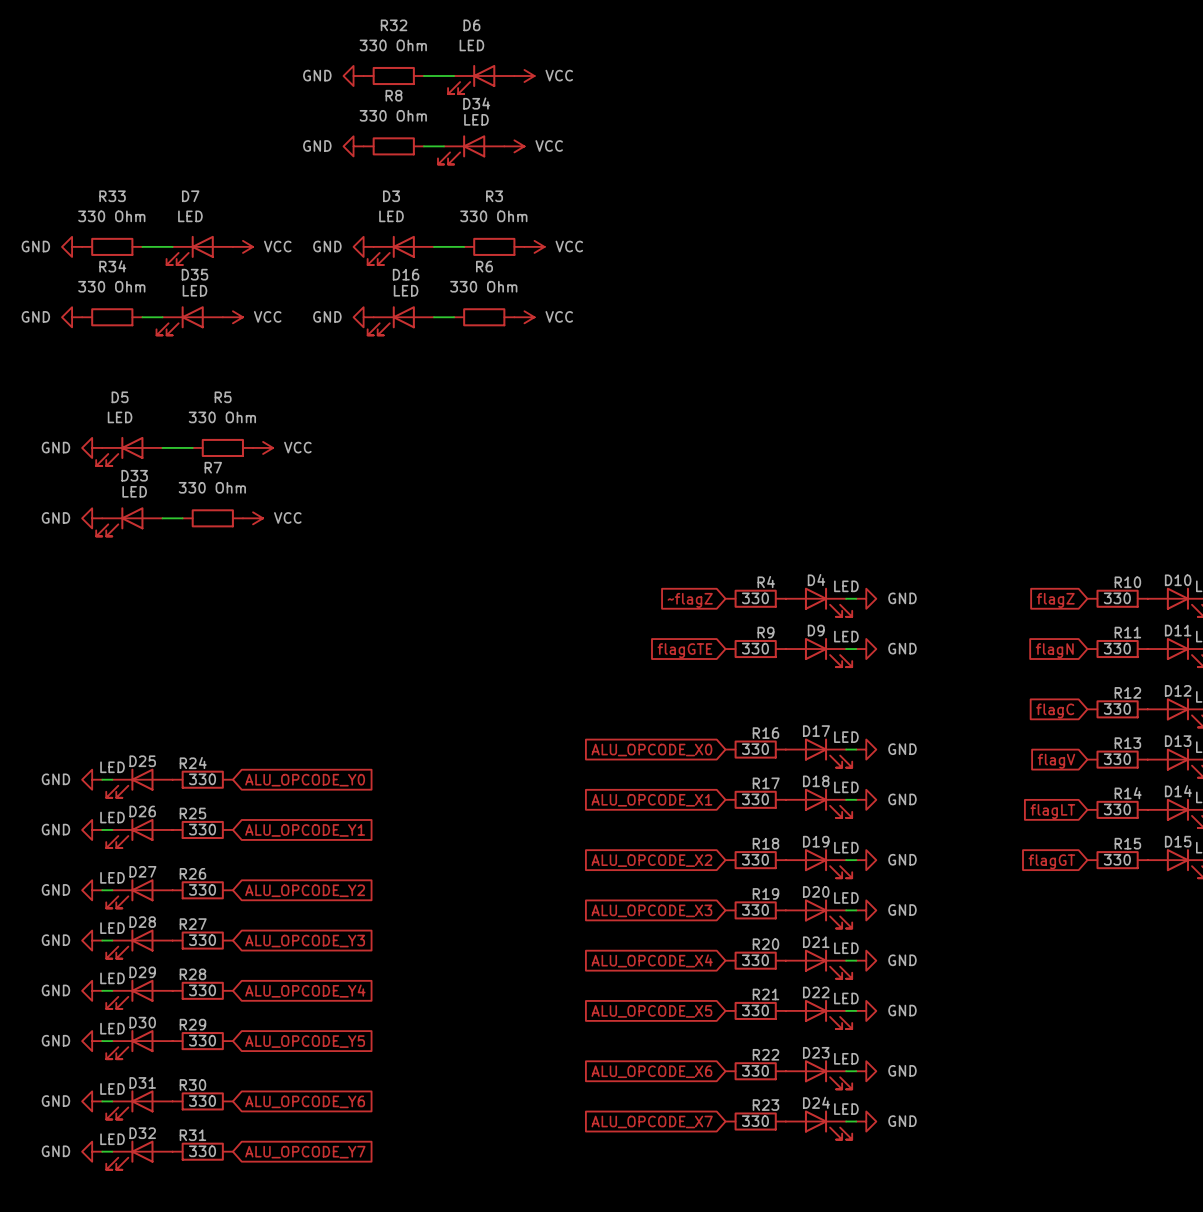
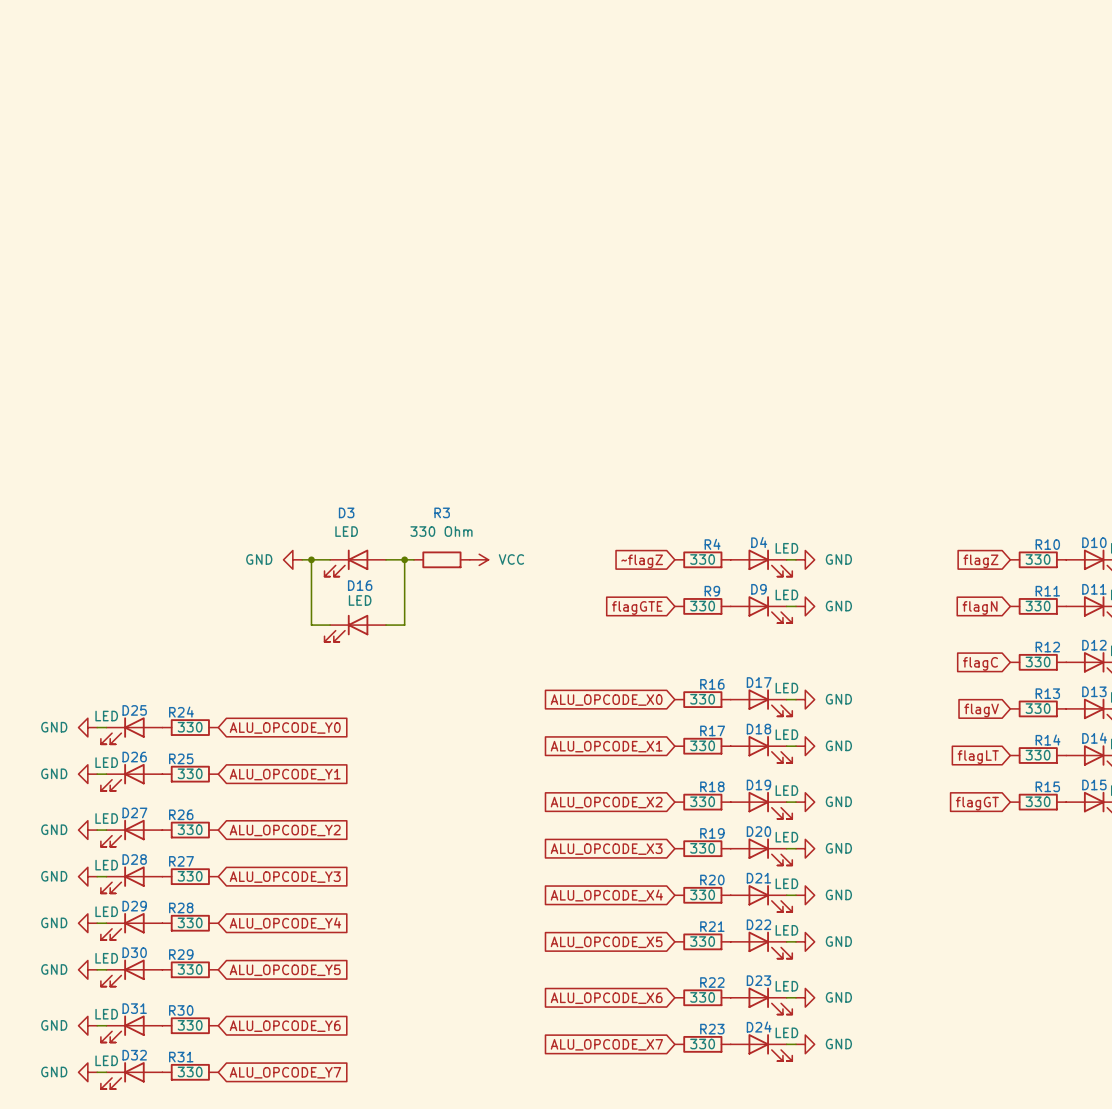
power symbol: GND (353, 76) -> none
R32: 330 Ohm (393, 76) -> none
wire: (423, 76) (454, 76) -> none
power symbol: VCC (524, 76) -> none
D6: LED (481, 79) -> none
power symbol: GND (353, 146) -> none
R8: 330 Ohm (393, 146) -> none
wire: (423, 146) (444, 146) -> none
power symbol: VCC (514, 146) -> none
D34: LED (471, 149) -> none
power symbol: GND (72, 246) -> none
R33: 330 Ohm (112, 246) -> none
wire: (142, 246) (172, 246) -> none
power symbol: VCC (242, 246) -> none
power symbol: GND (363, 246) -> none
wire: (433, 246) (464, 246) -> none
R3 position: (494, 246) -> (441, 559)
power symbol: VCC (534, 246) -> none
D7: LED (199, 250) -> none
D3 position: (400, 250) -> (355, 563)
power symbol: GND (72, 317) -> none
R34: 330 Ohm (112, 317) -> none
wire: (142, 317) (162, 317) -> none
power symbol: VCC (232, 317) -> none
power symbol: GND (363, 317) -> none
wire: (433, 317) (454, 317) -> none
R6: 330 Ohm (484, 317) -> none
power symbol: VCC (524, 317) -> none
D35: LED (189, 320) -> none
D16 position: (400, 320) -> (355, 628)
power symbol: GND (92, 447) -> none
wire: (162, 447) (192, 447) -> none
R5: 330 Ohm (222, 447) -> none
power symbol: VCC (263, 447) -> none
D5: LED (129, 451) -> none
power symbol: GND (92, 518) -> none
wire: (162, 518) (182, 518) -> none
R7: 330 Ohm (212, 518) -> none
power symbol: VCC (253, 518) -> none
D33: LED (129, 521) -> none
power symbol: none -> GND (292, 559)
wire: none -> (302, 559) (330, 559)
wire: none -> (311, 559) (311, 625) (330, 625)
junction: none -> (311, 559)
wire: none -> (386, 559) (413, 559)
wire: none -> (404, 559) (404, 625) (386, 625)
junction: none -> (404, 559)
power symbol: none -> VCC (479, 559)

